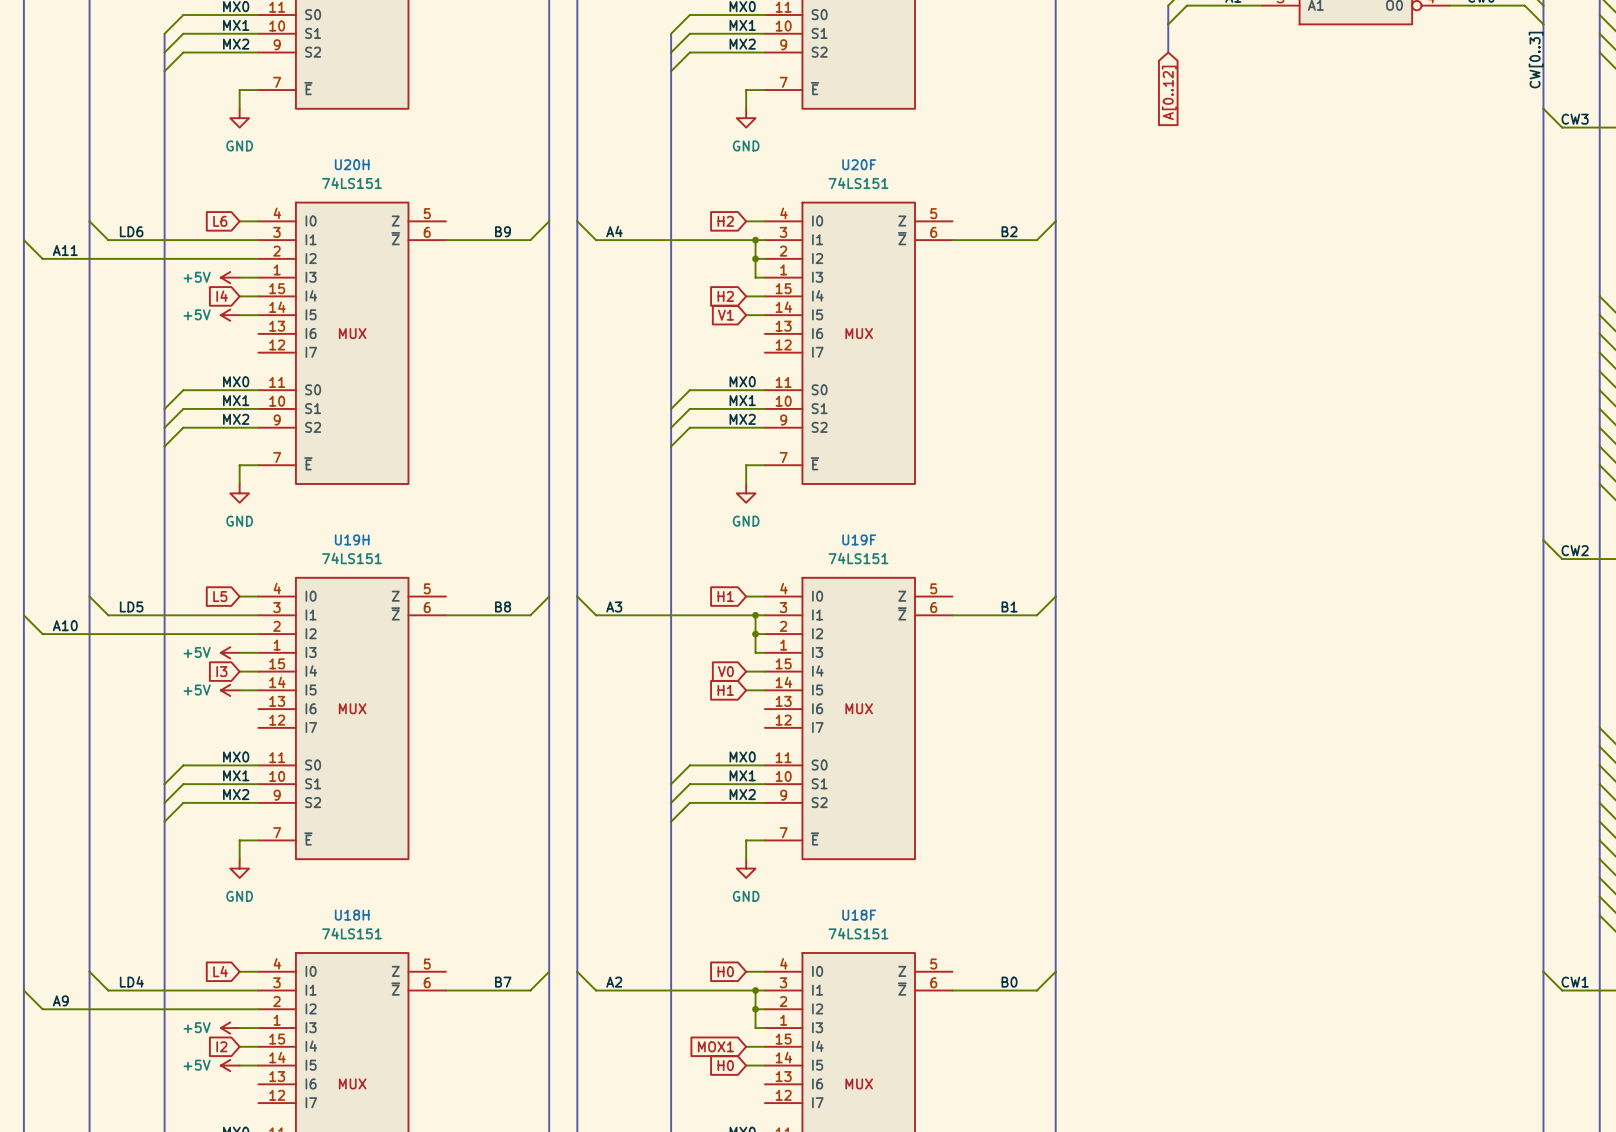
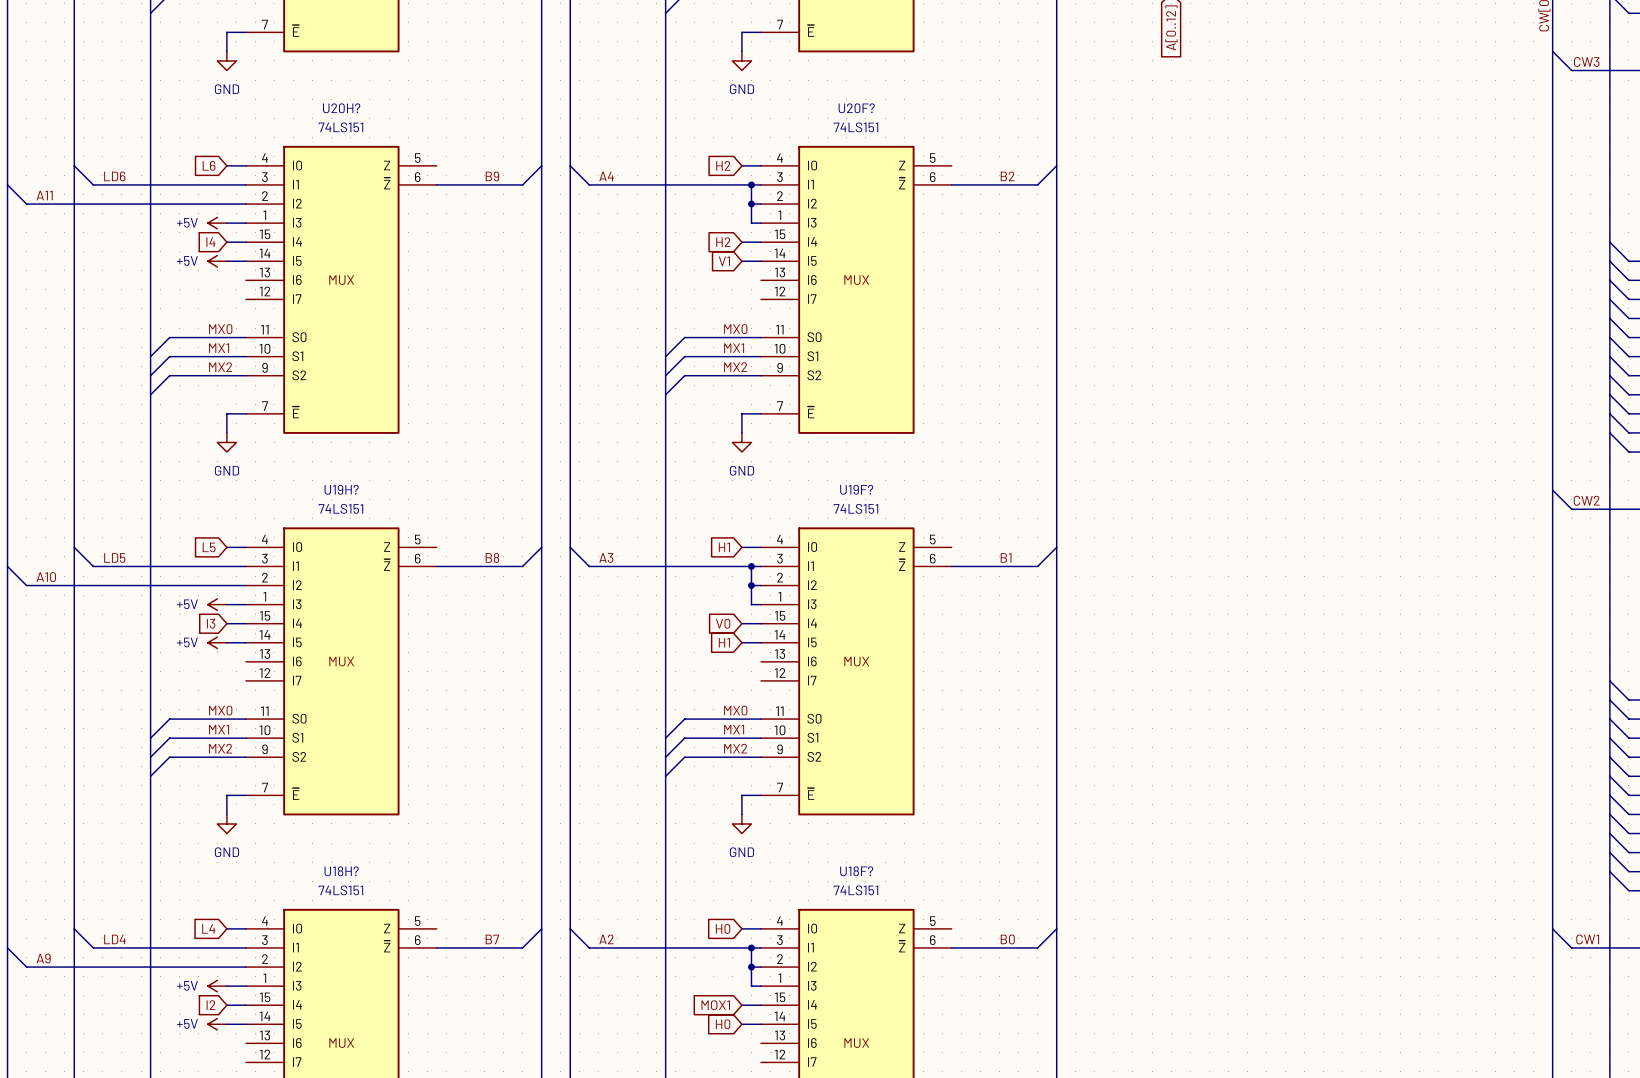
U20H name: U20H (352, 164) -> U20H? (341, 108)
U20F name: U20F (859, 164) -> U20F? (856, 108)
U19H name: U19H (352, 539) -> U19H? (341, 489)
U19F name: U19F (859, 539) -> U19F? (856, 489)
U18H name: U18H (352, 915) -> U18H? (341, 871)
U18F name: U18F (859, 915) -> U18F? (856, 871)

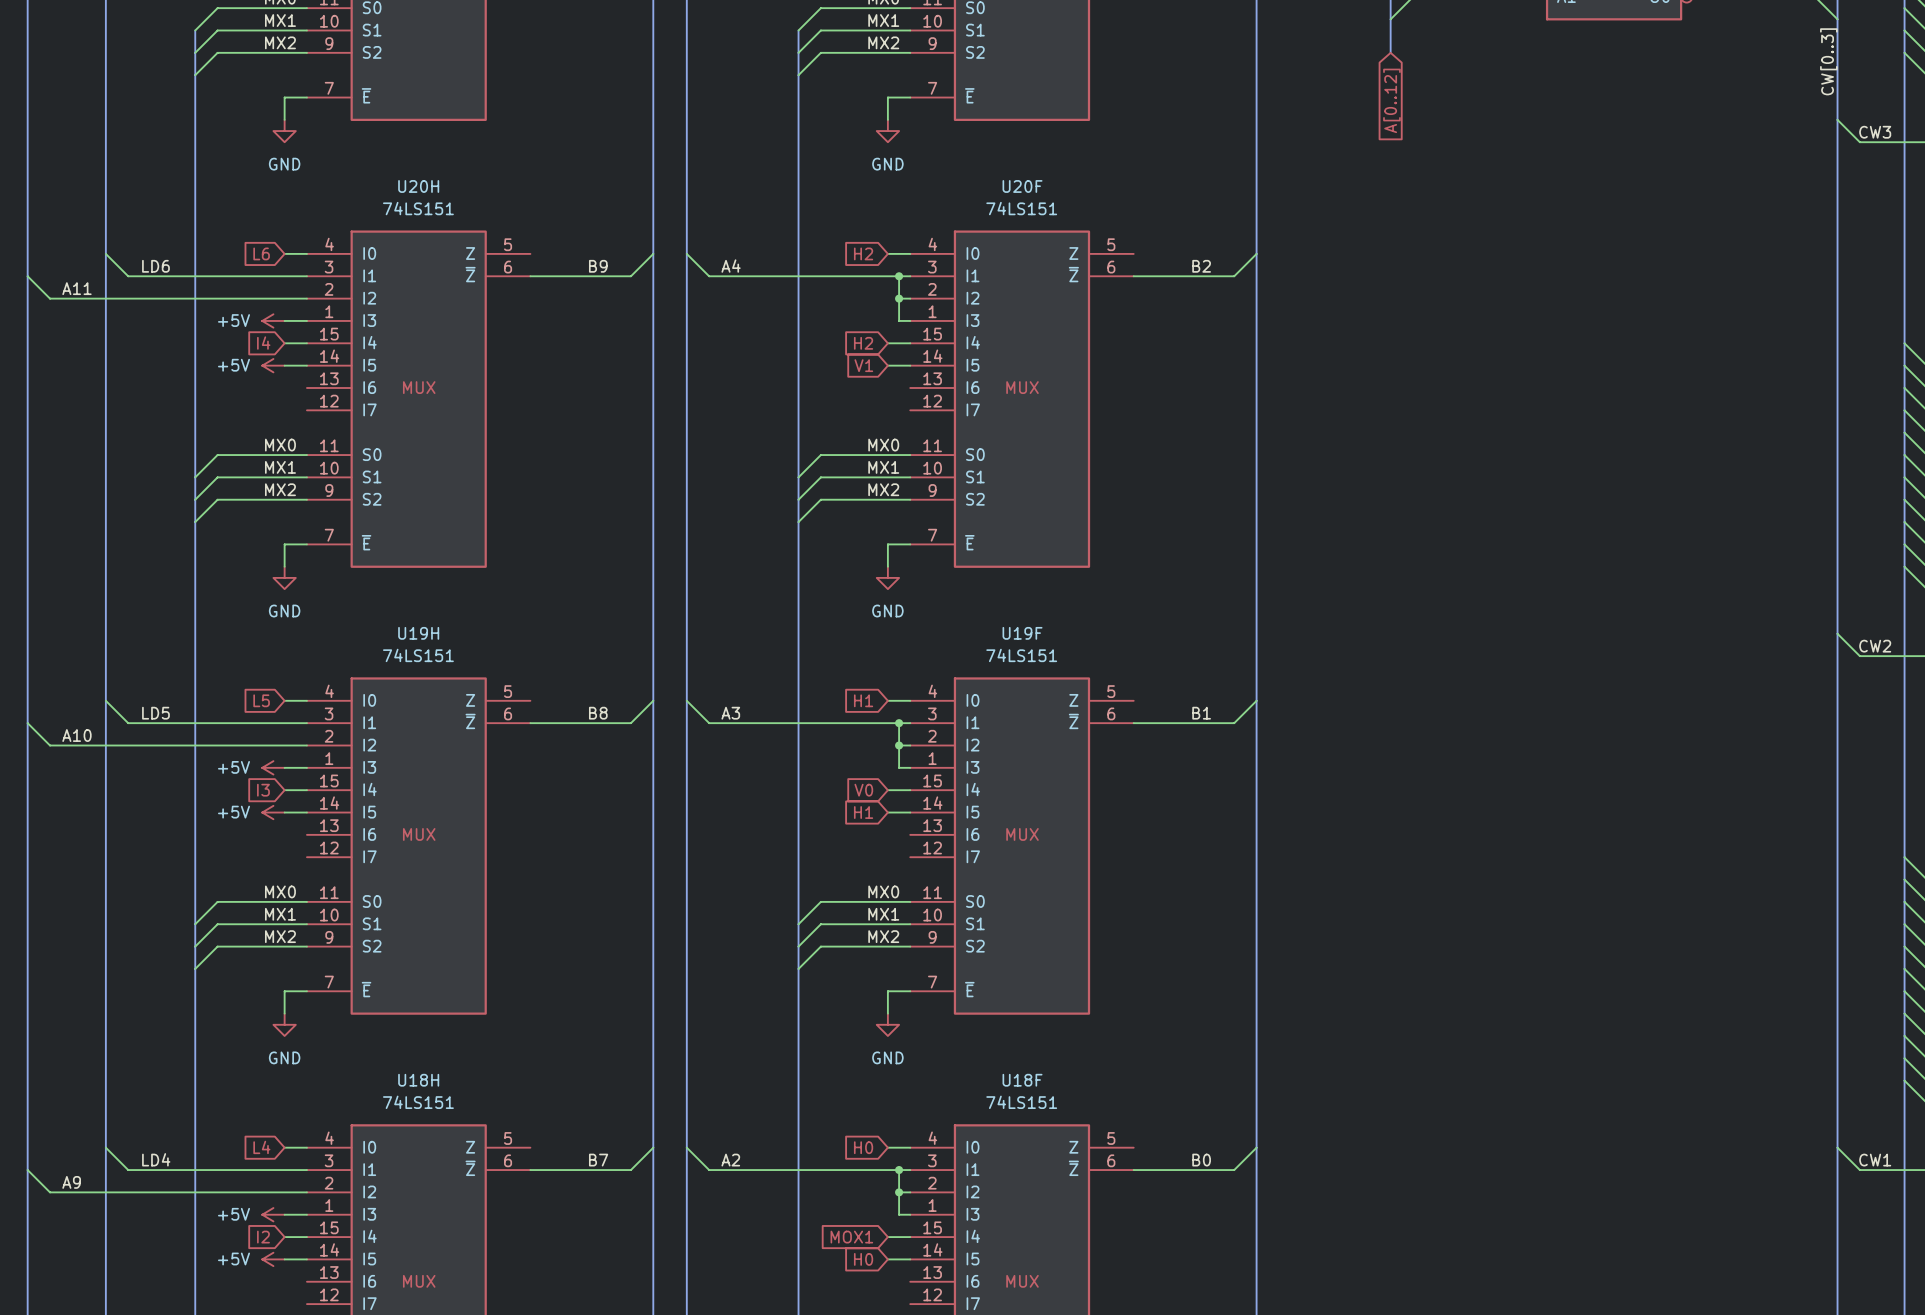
U20H? name: U20H? (341, 108) -> U20H (418, 186)
U20F? name: U20F? (856, 108) -> U20F (1022, 186)
U19H? name: U19H? (341, 489) -> U19H (418, 633)
U19F? name: U19F? (856, 489) -> U19F (1022, 633)
U18H? name: U18H? (341, 871) -> U18H (418, 1080)
U18F? name: U18F? (856, 871) -> U18F (1022, 1080)

